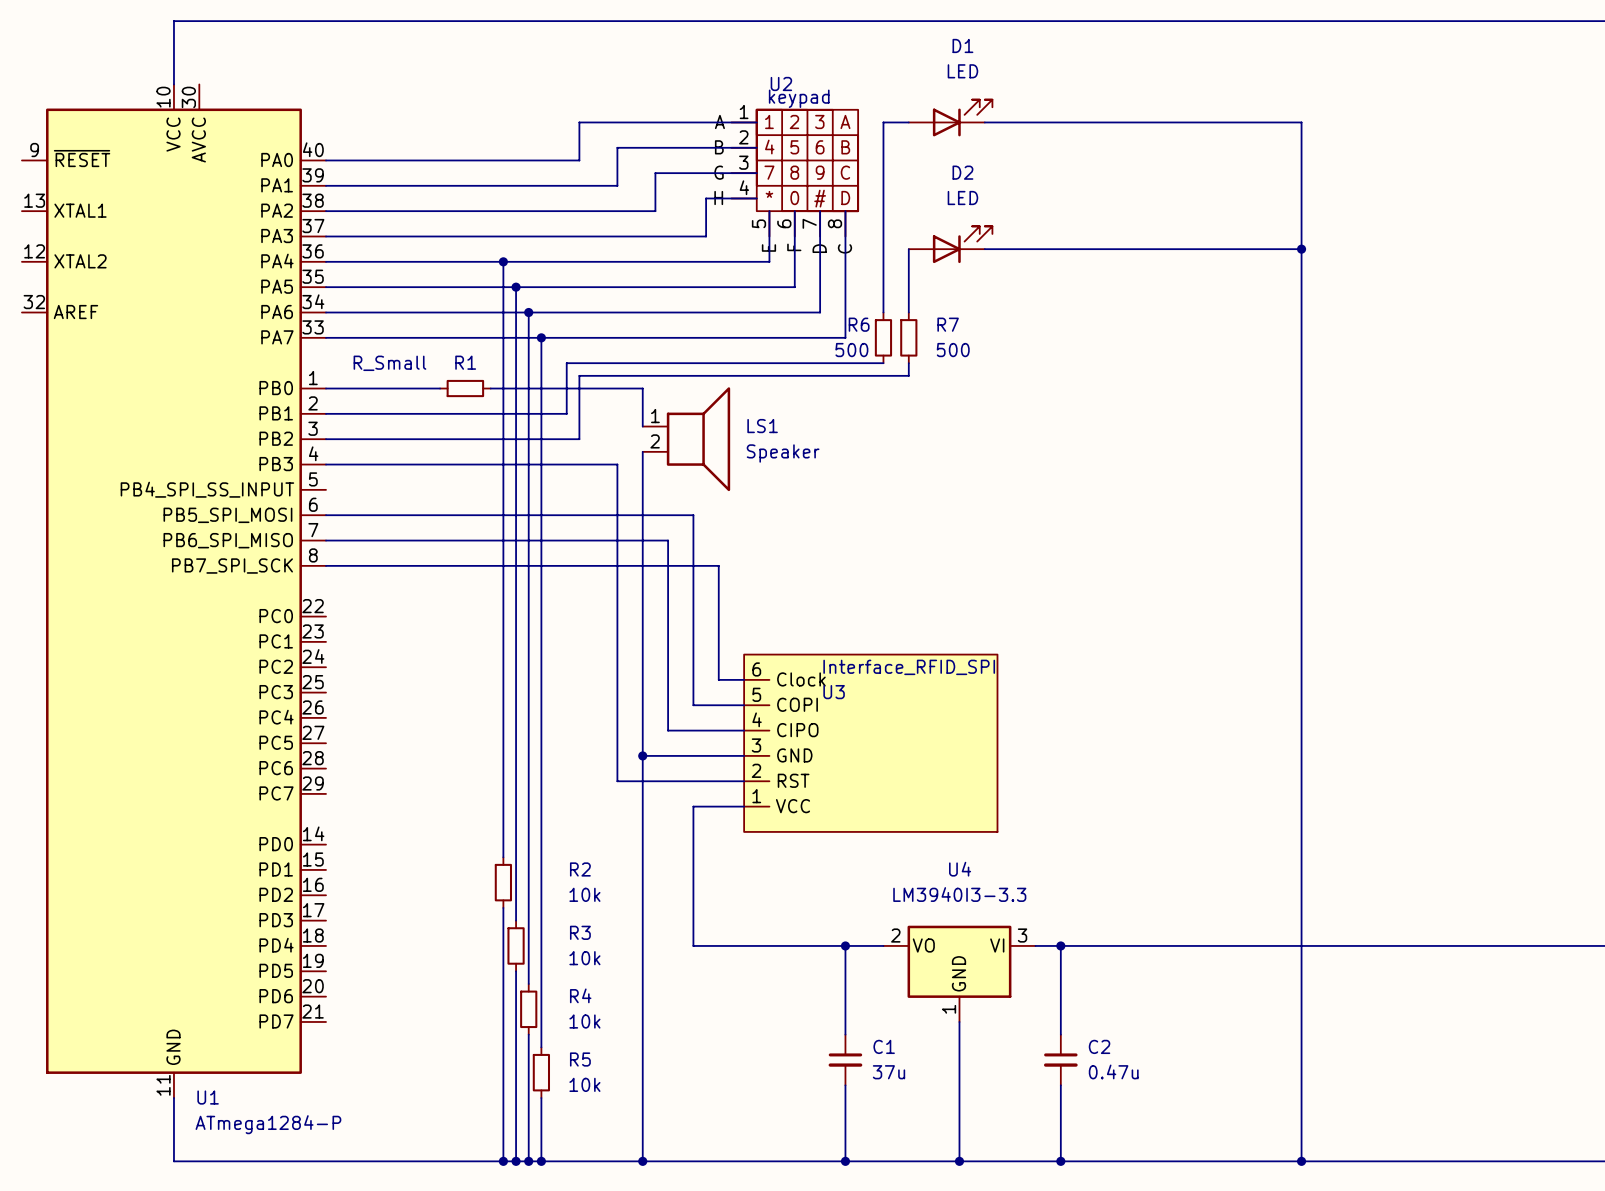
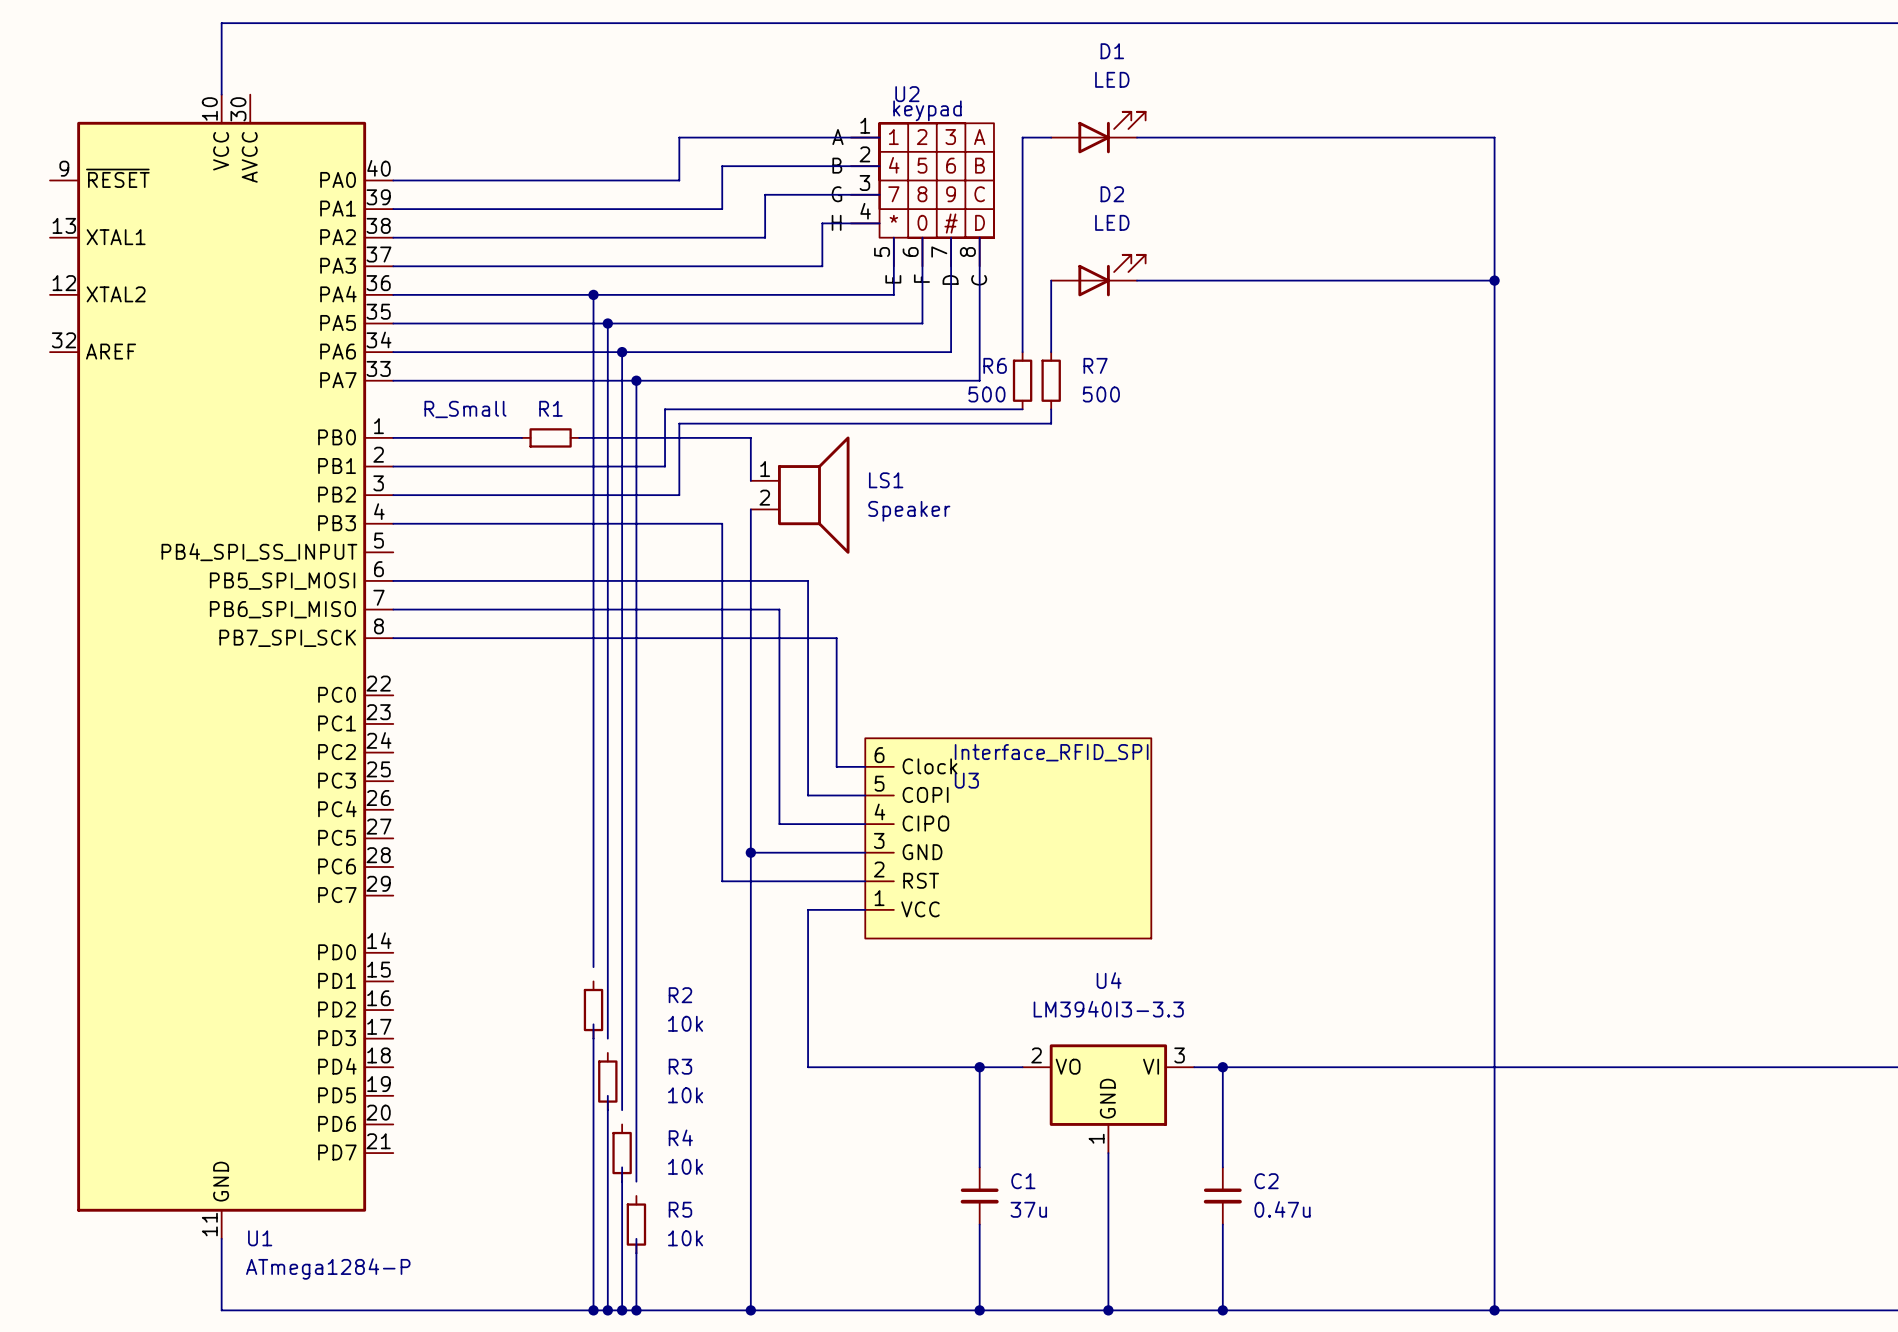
R2 position: (503, 882) -> (593, 1010)
R3 position: (516, 945) -> (607, 1081)
R4 position: (528, 1009) -> (622, 1153)
R5 position: (541, 1072) -> (636, 1224)

